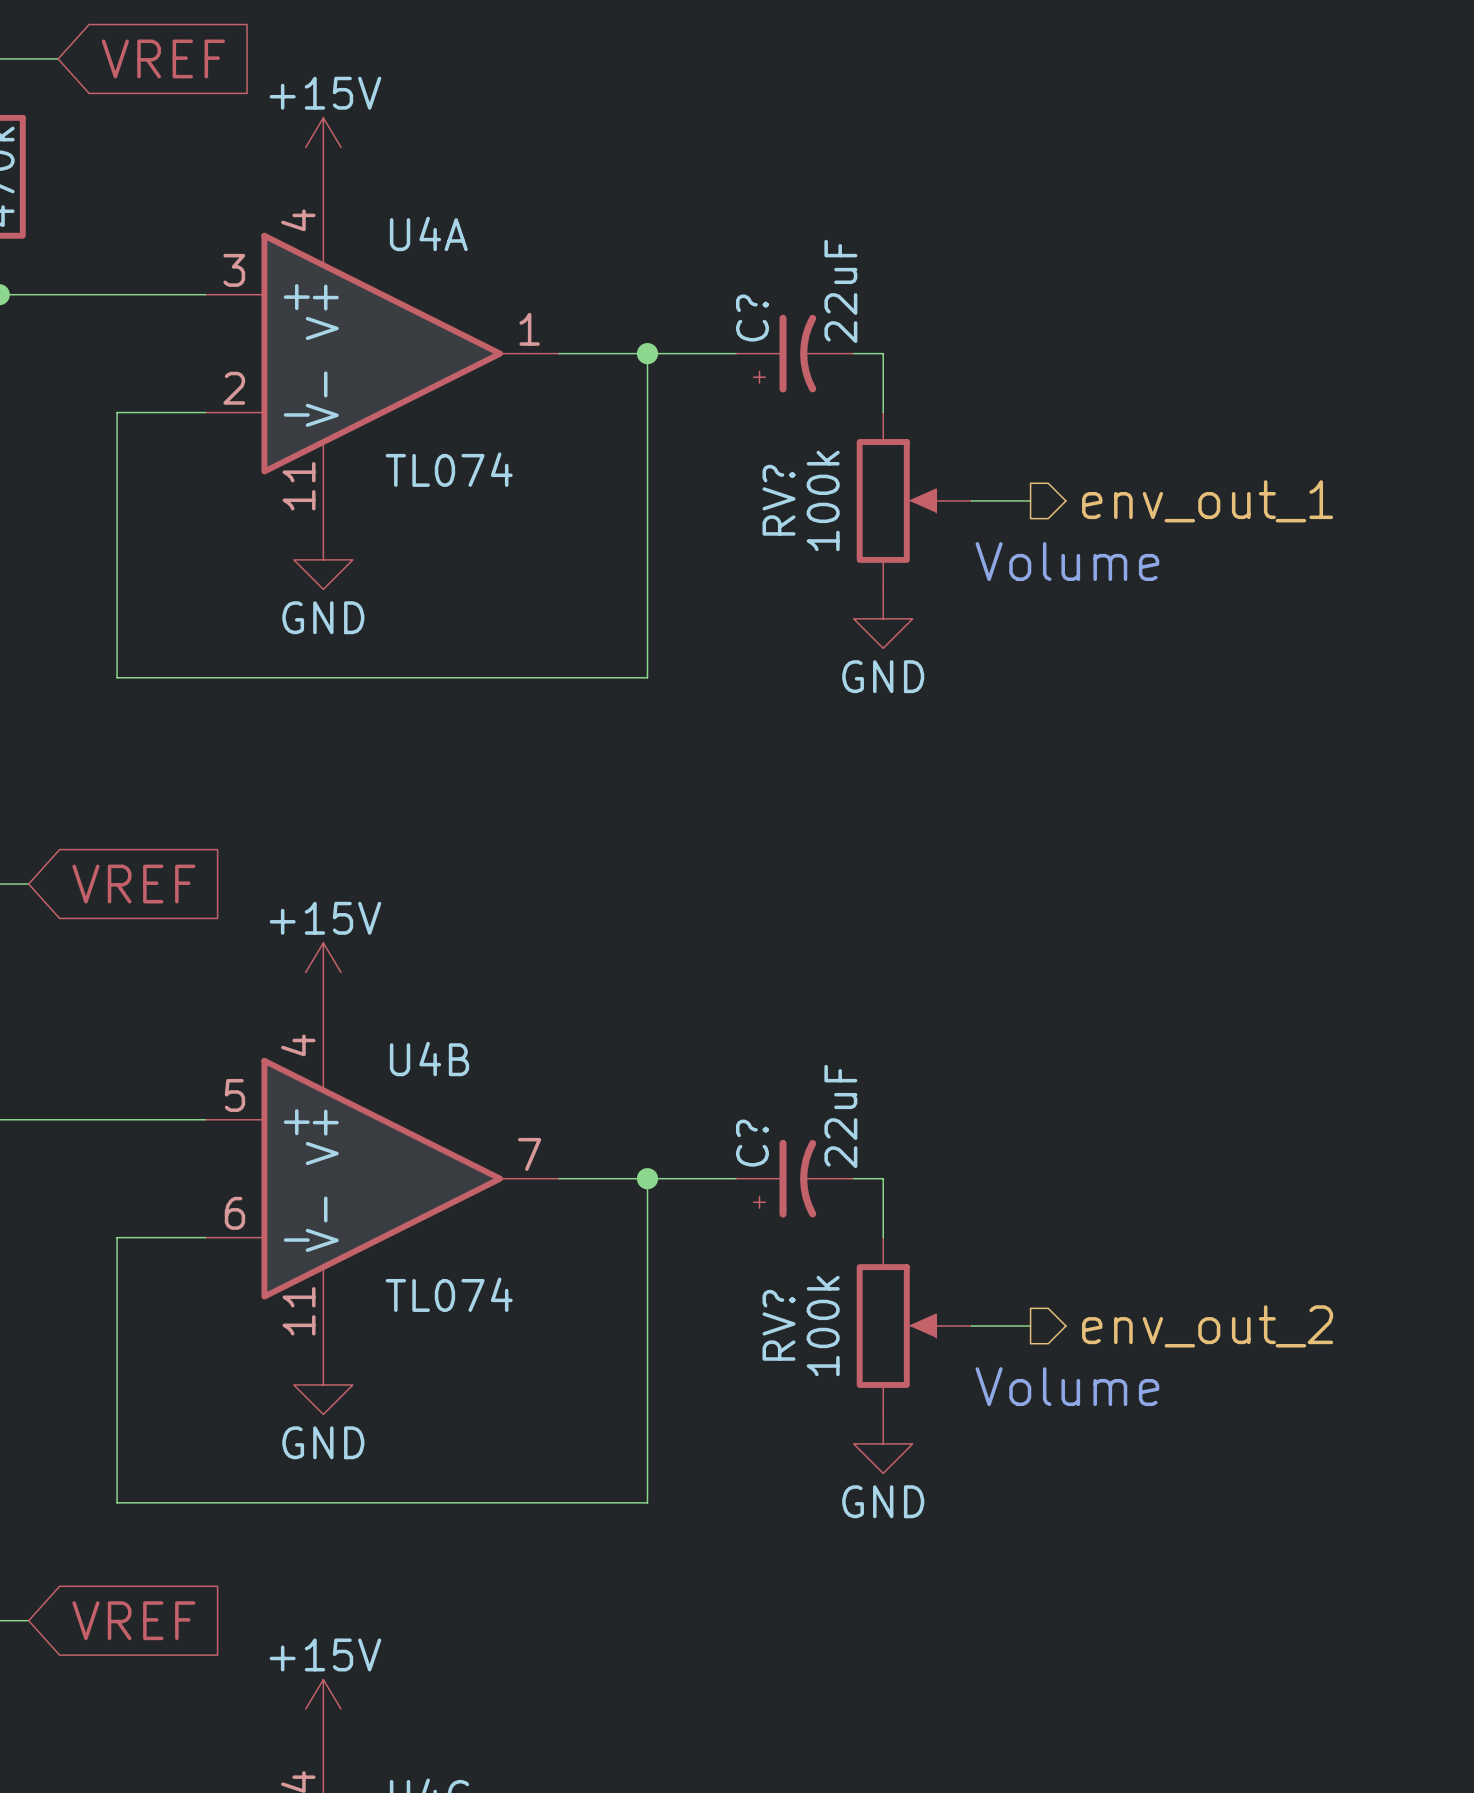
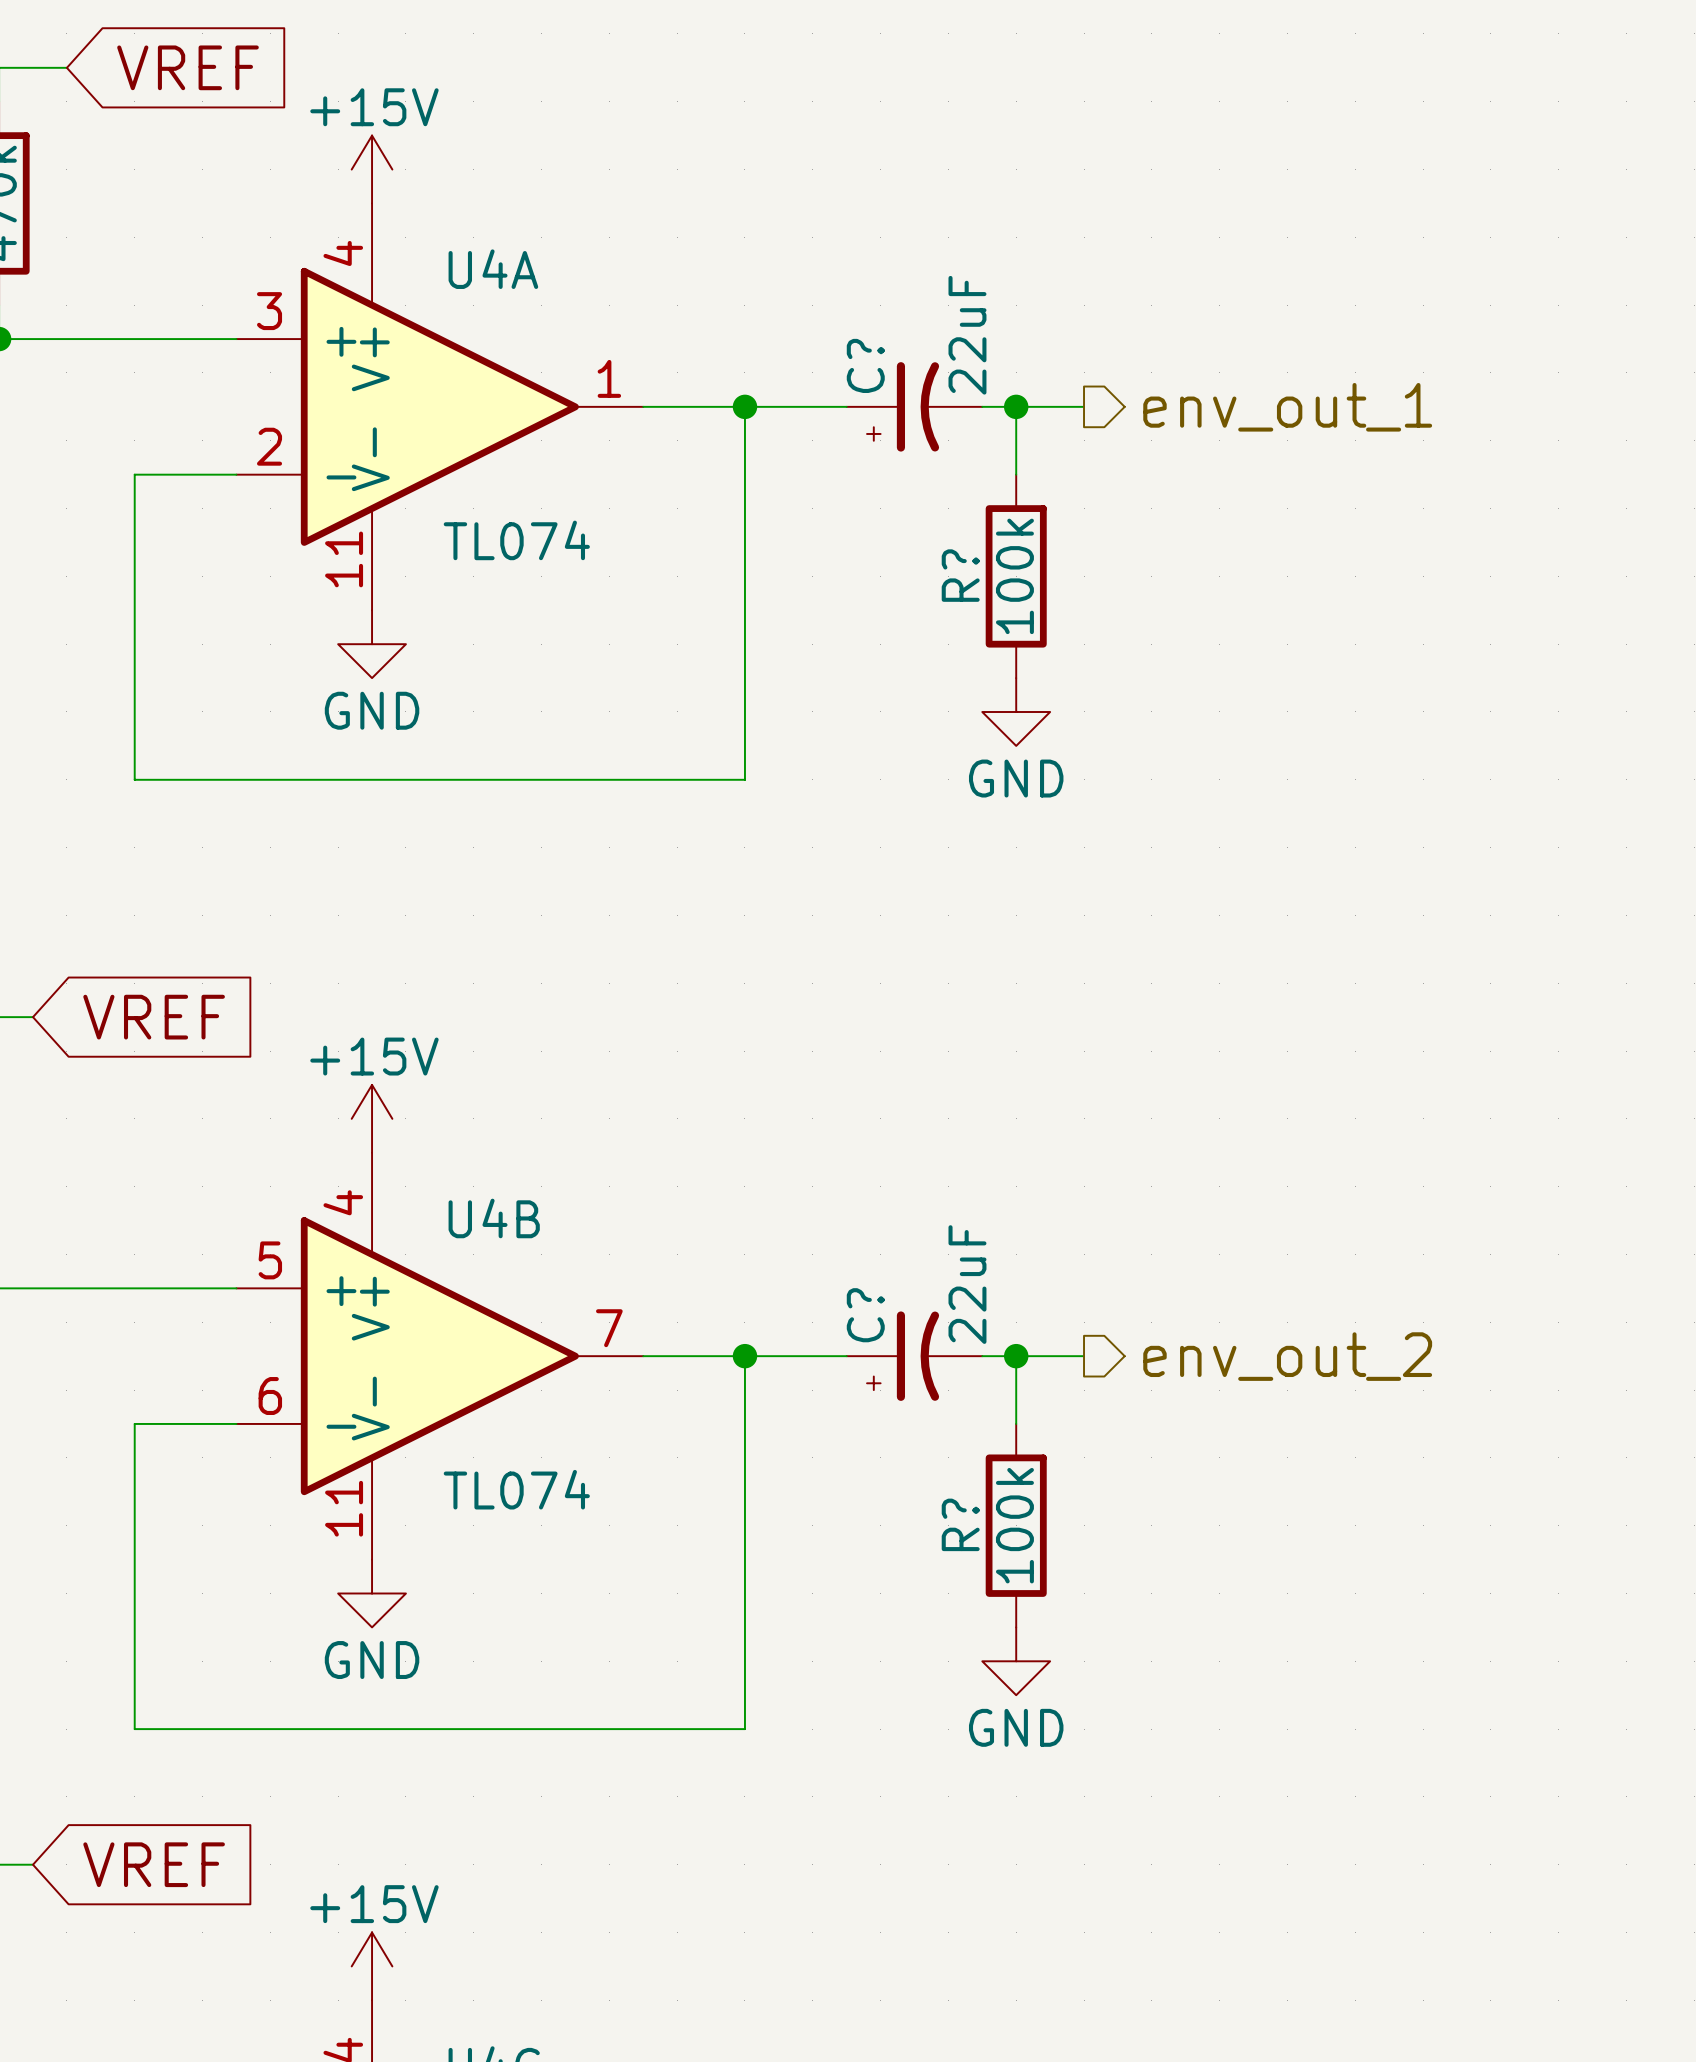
junction: none -> (1016, 406)
R?: none -> 100k (1016, 576)
RV?: 100k (914, 500) -> none
wire: (971, 500) (1030, 500) -> (1016, 406) (1084, 406)
hierarchical label position: env_out_1 (1207, 501) -> env_out_1 (1287, 407)
text: Volume (1067, 561) -> none
junction: none -> (1016, 1356)
R?: none -> 100k (1016, 1525)
RV?: 100k (914, 1326) -> none
wire: (971, 1326) (1030, 1326) -> (1016, 1356) (1084, 1356)
hierarchical label position: env_out_2 (1207, 1326) -> env_out_2 (1287, 1356)
text: Volume (1067, 1386) -> none

